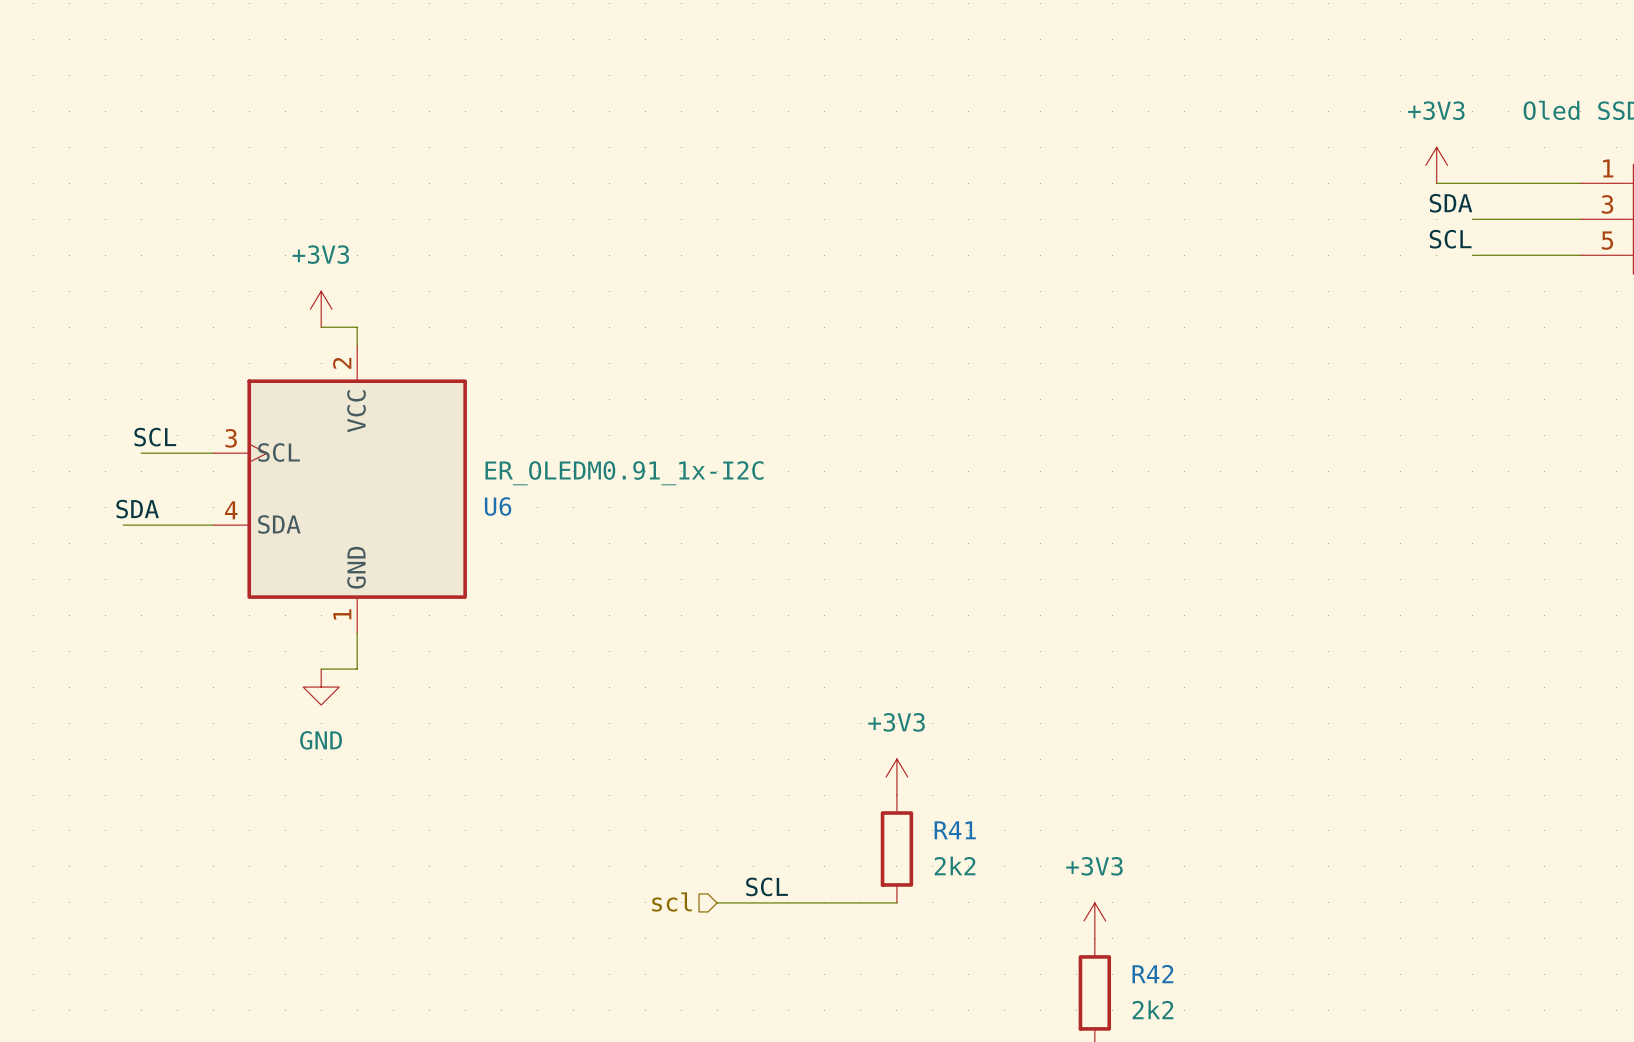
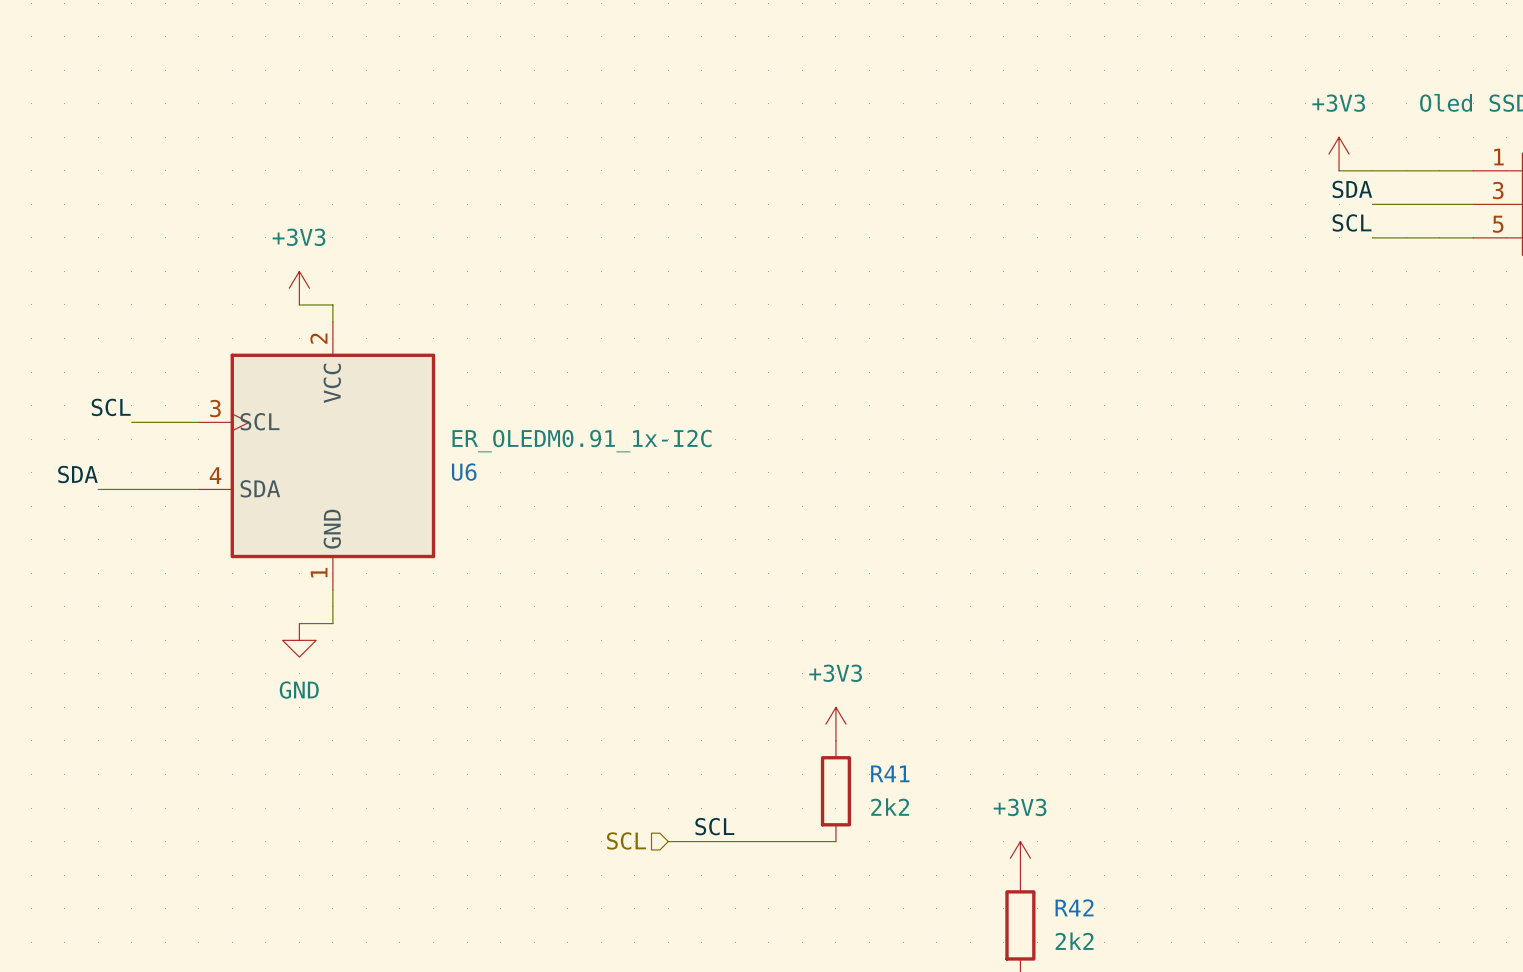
label position: SCL (155, 437) -> SCL (111, 407)
label position: SDA (137, 509) -> SDA (77, 474)
wire: none -> (98, 489) (114, 489)
hierarchical label: scl (671, 902) -> SCL (626, 840)

